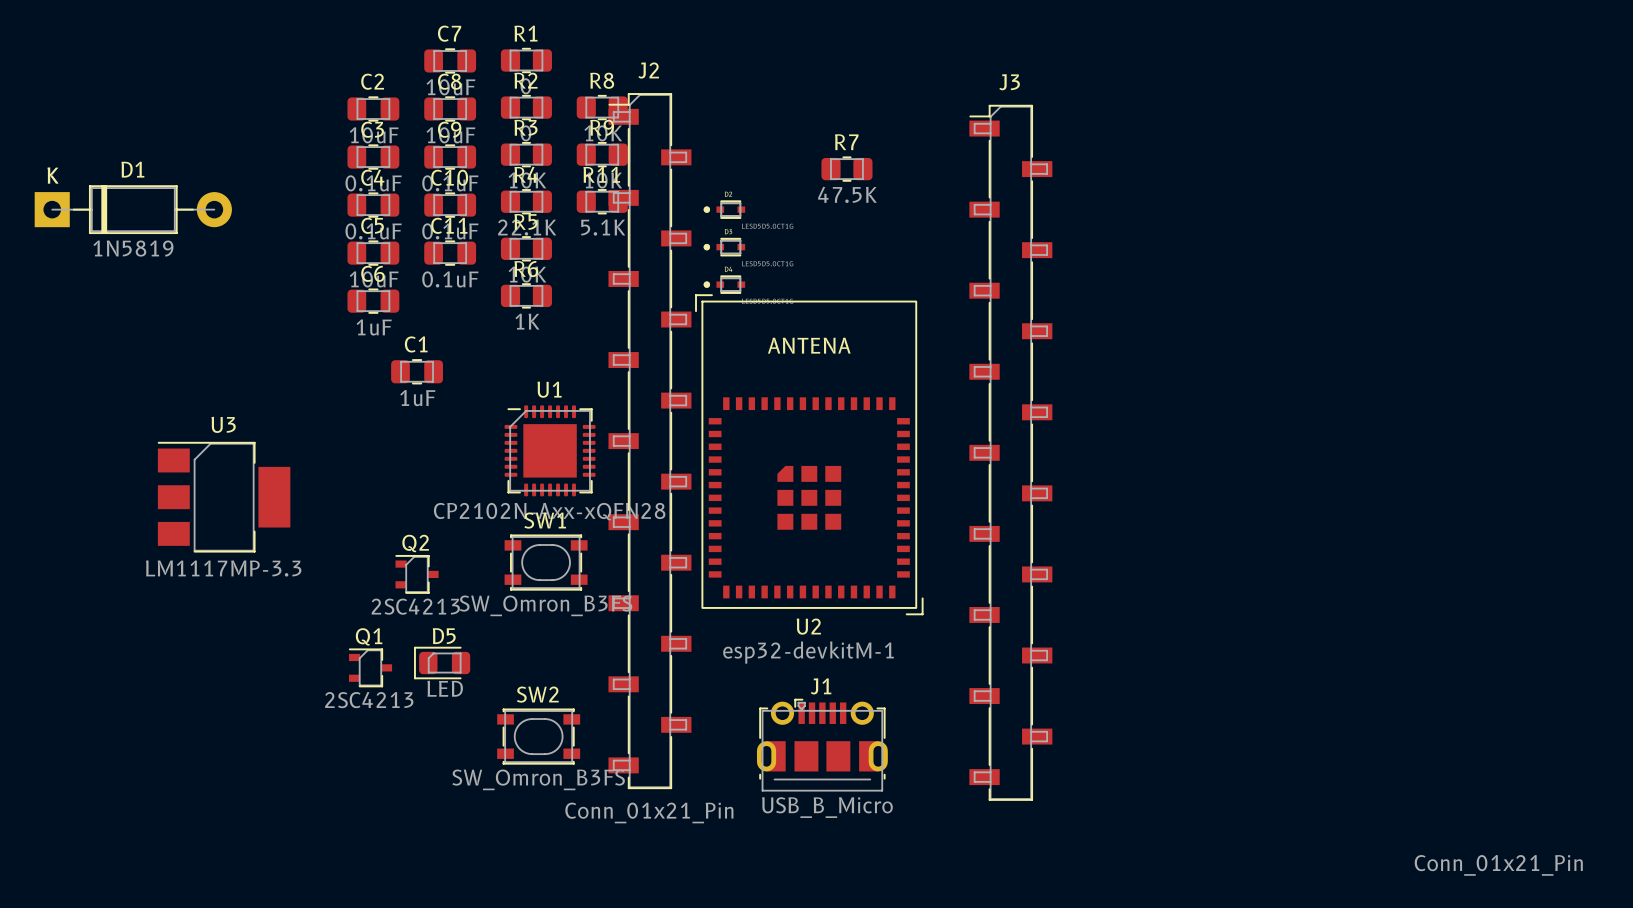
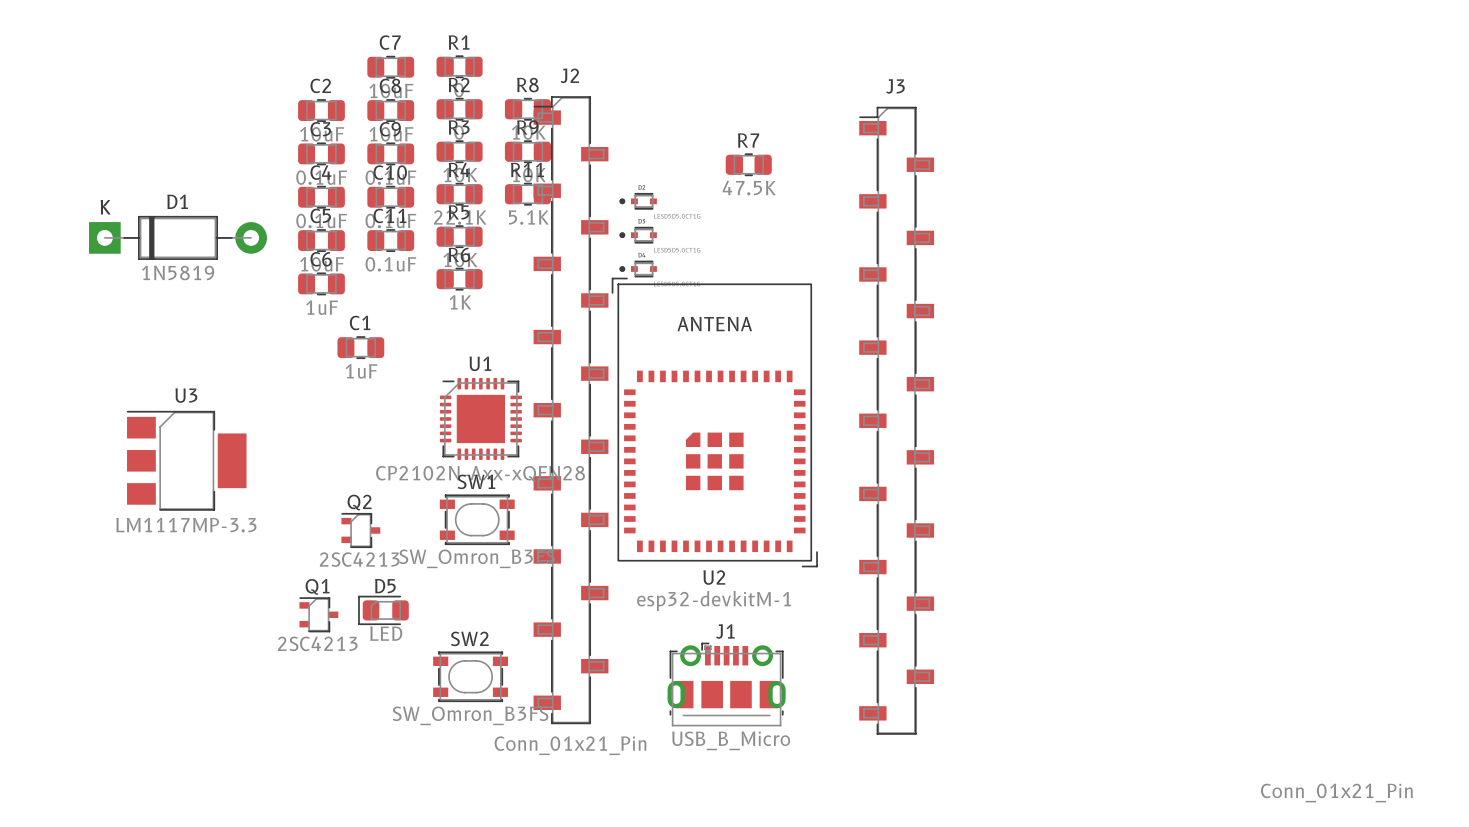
D1 position: (133, 209) -> (178, 237)

